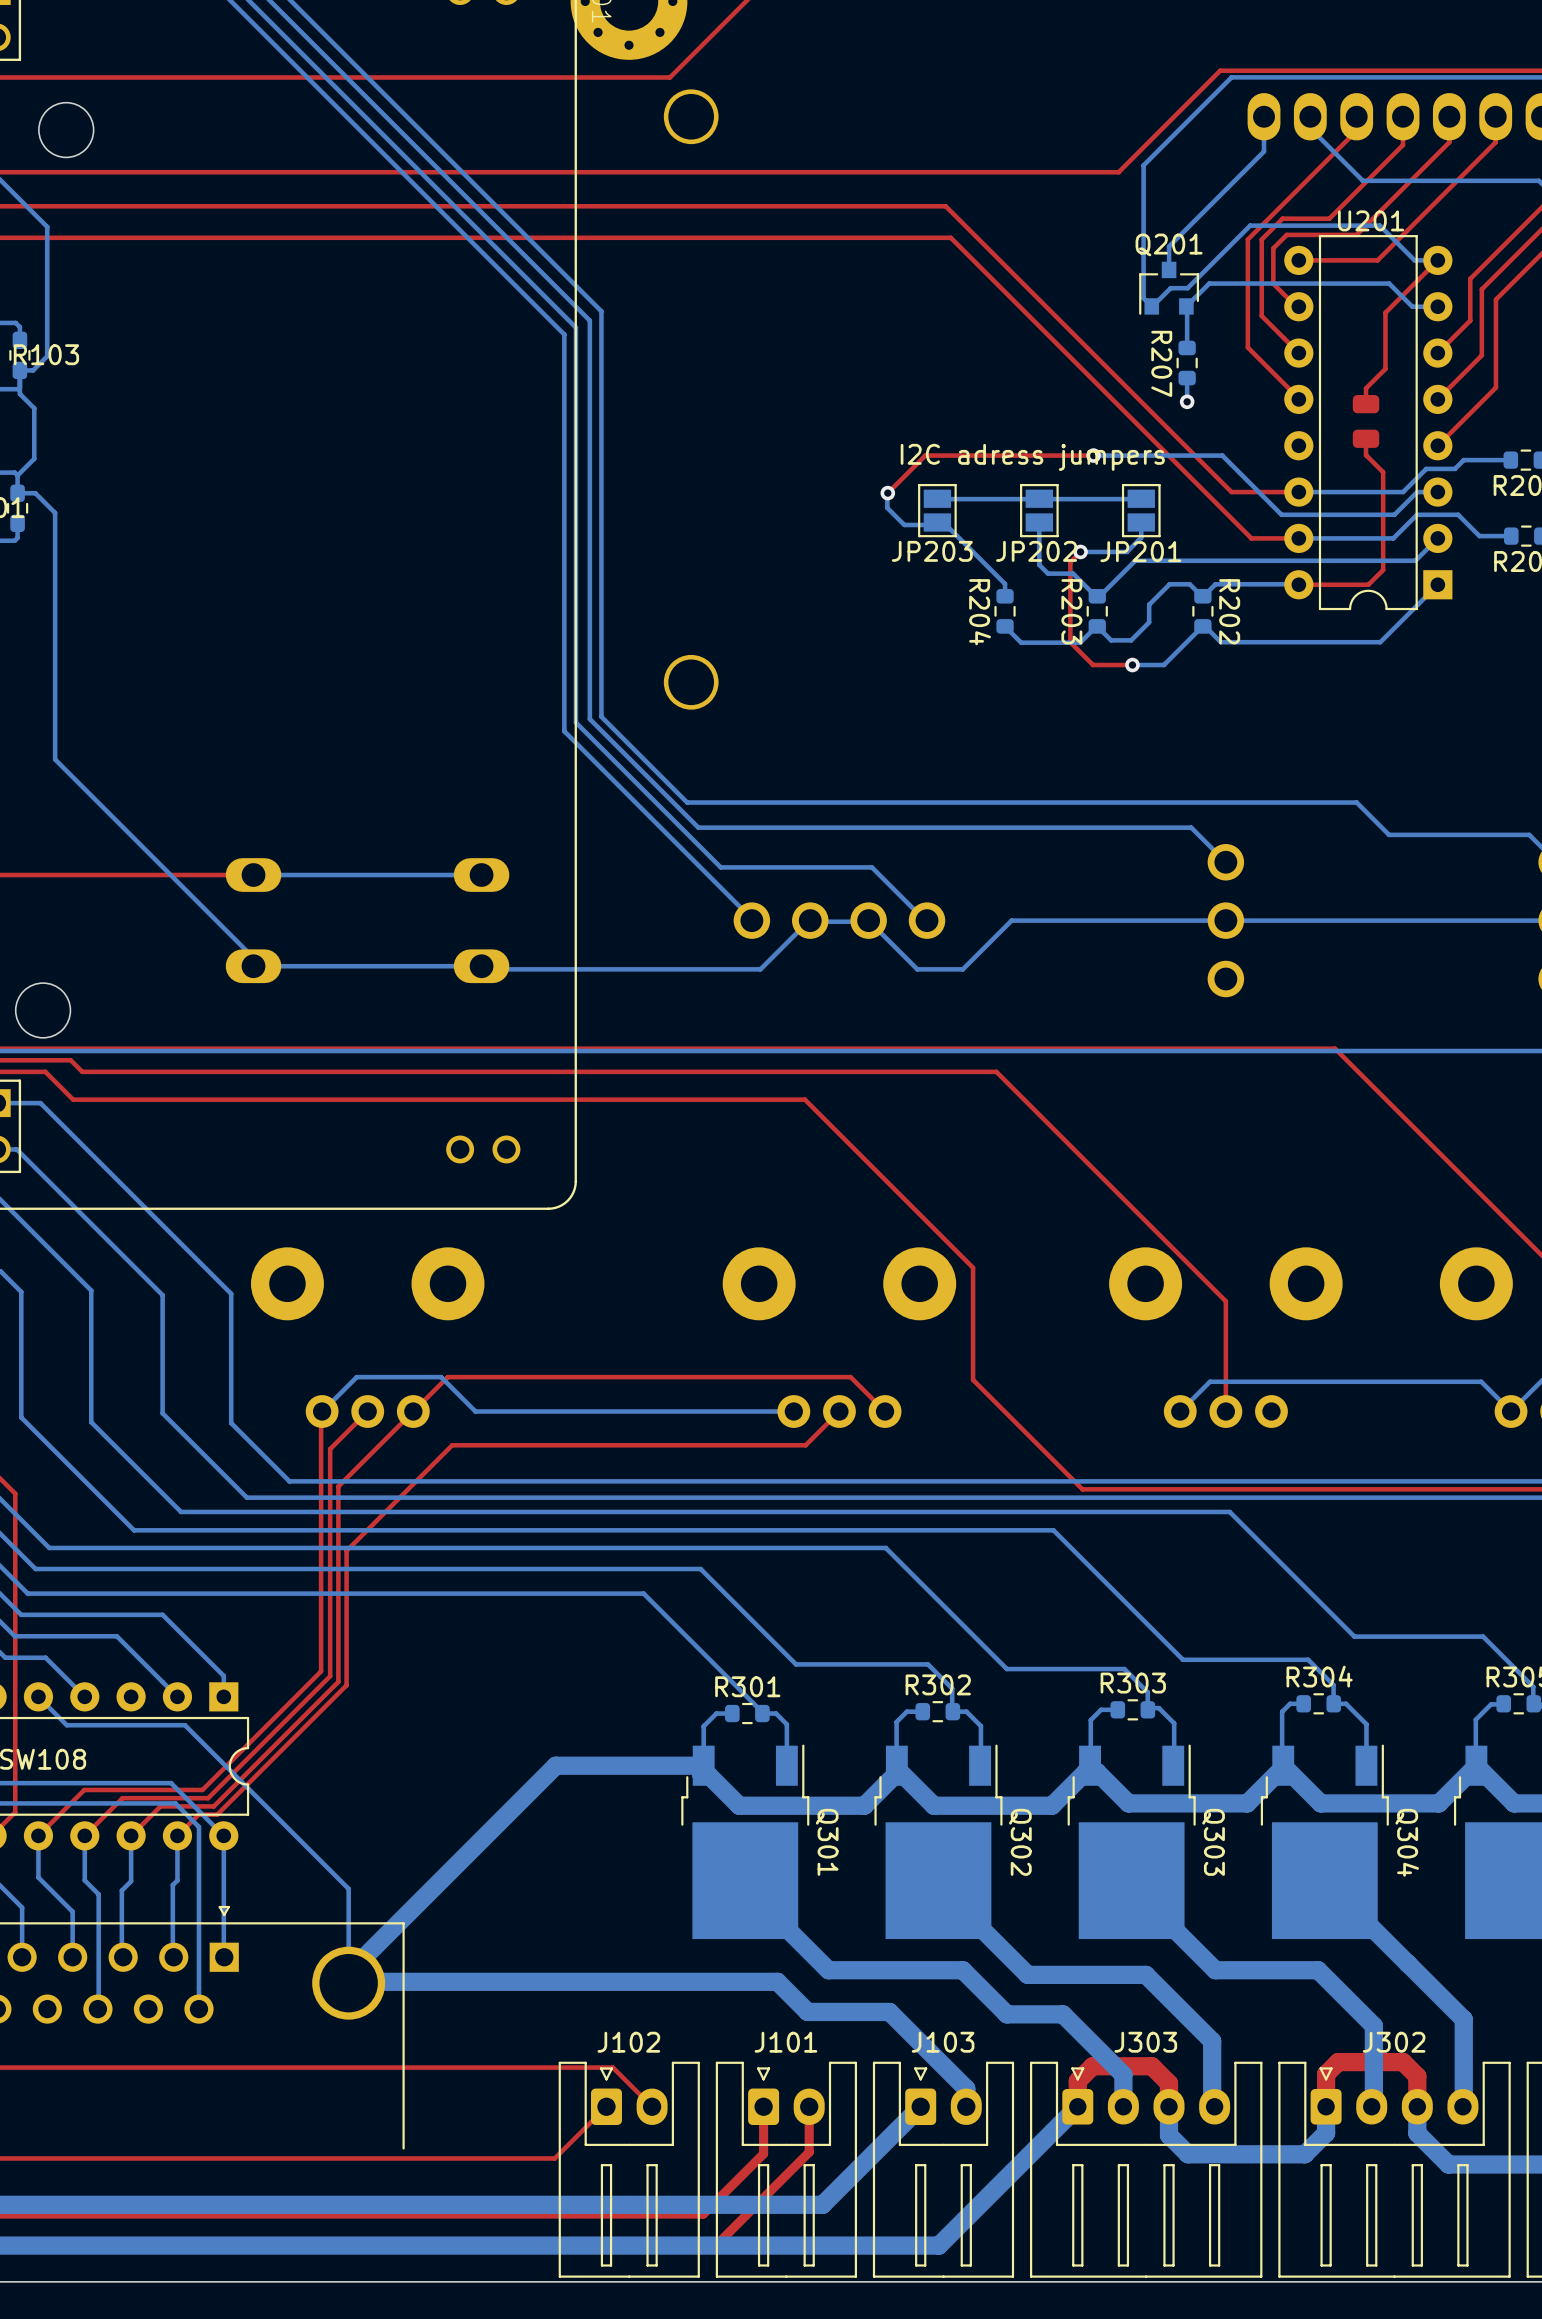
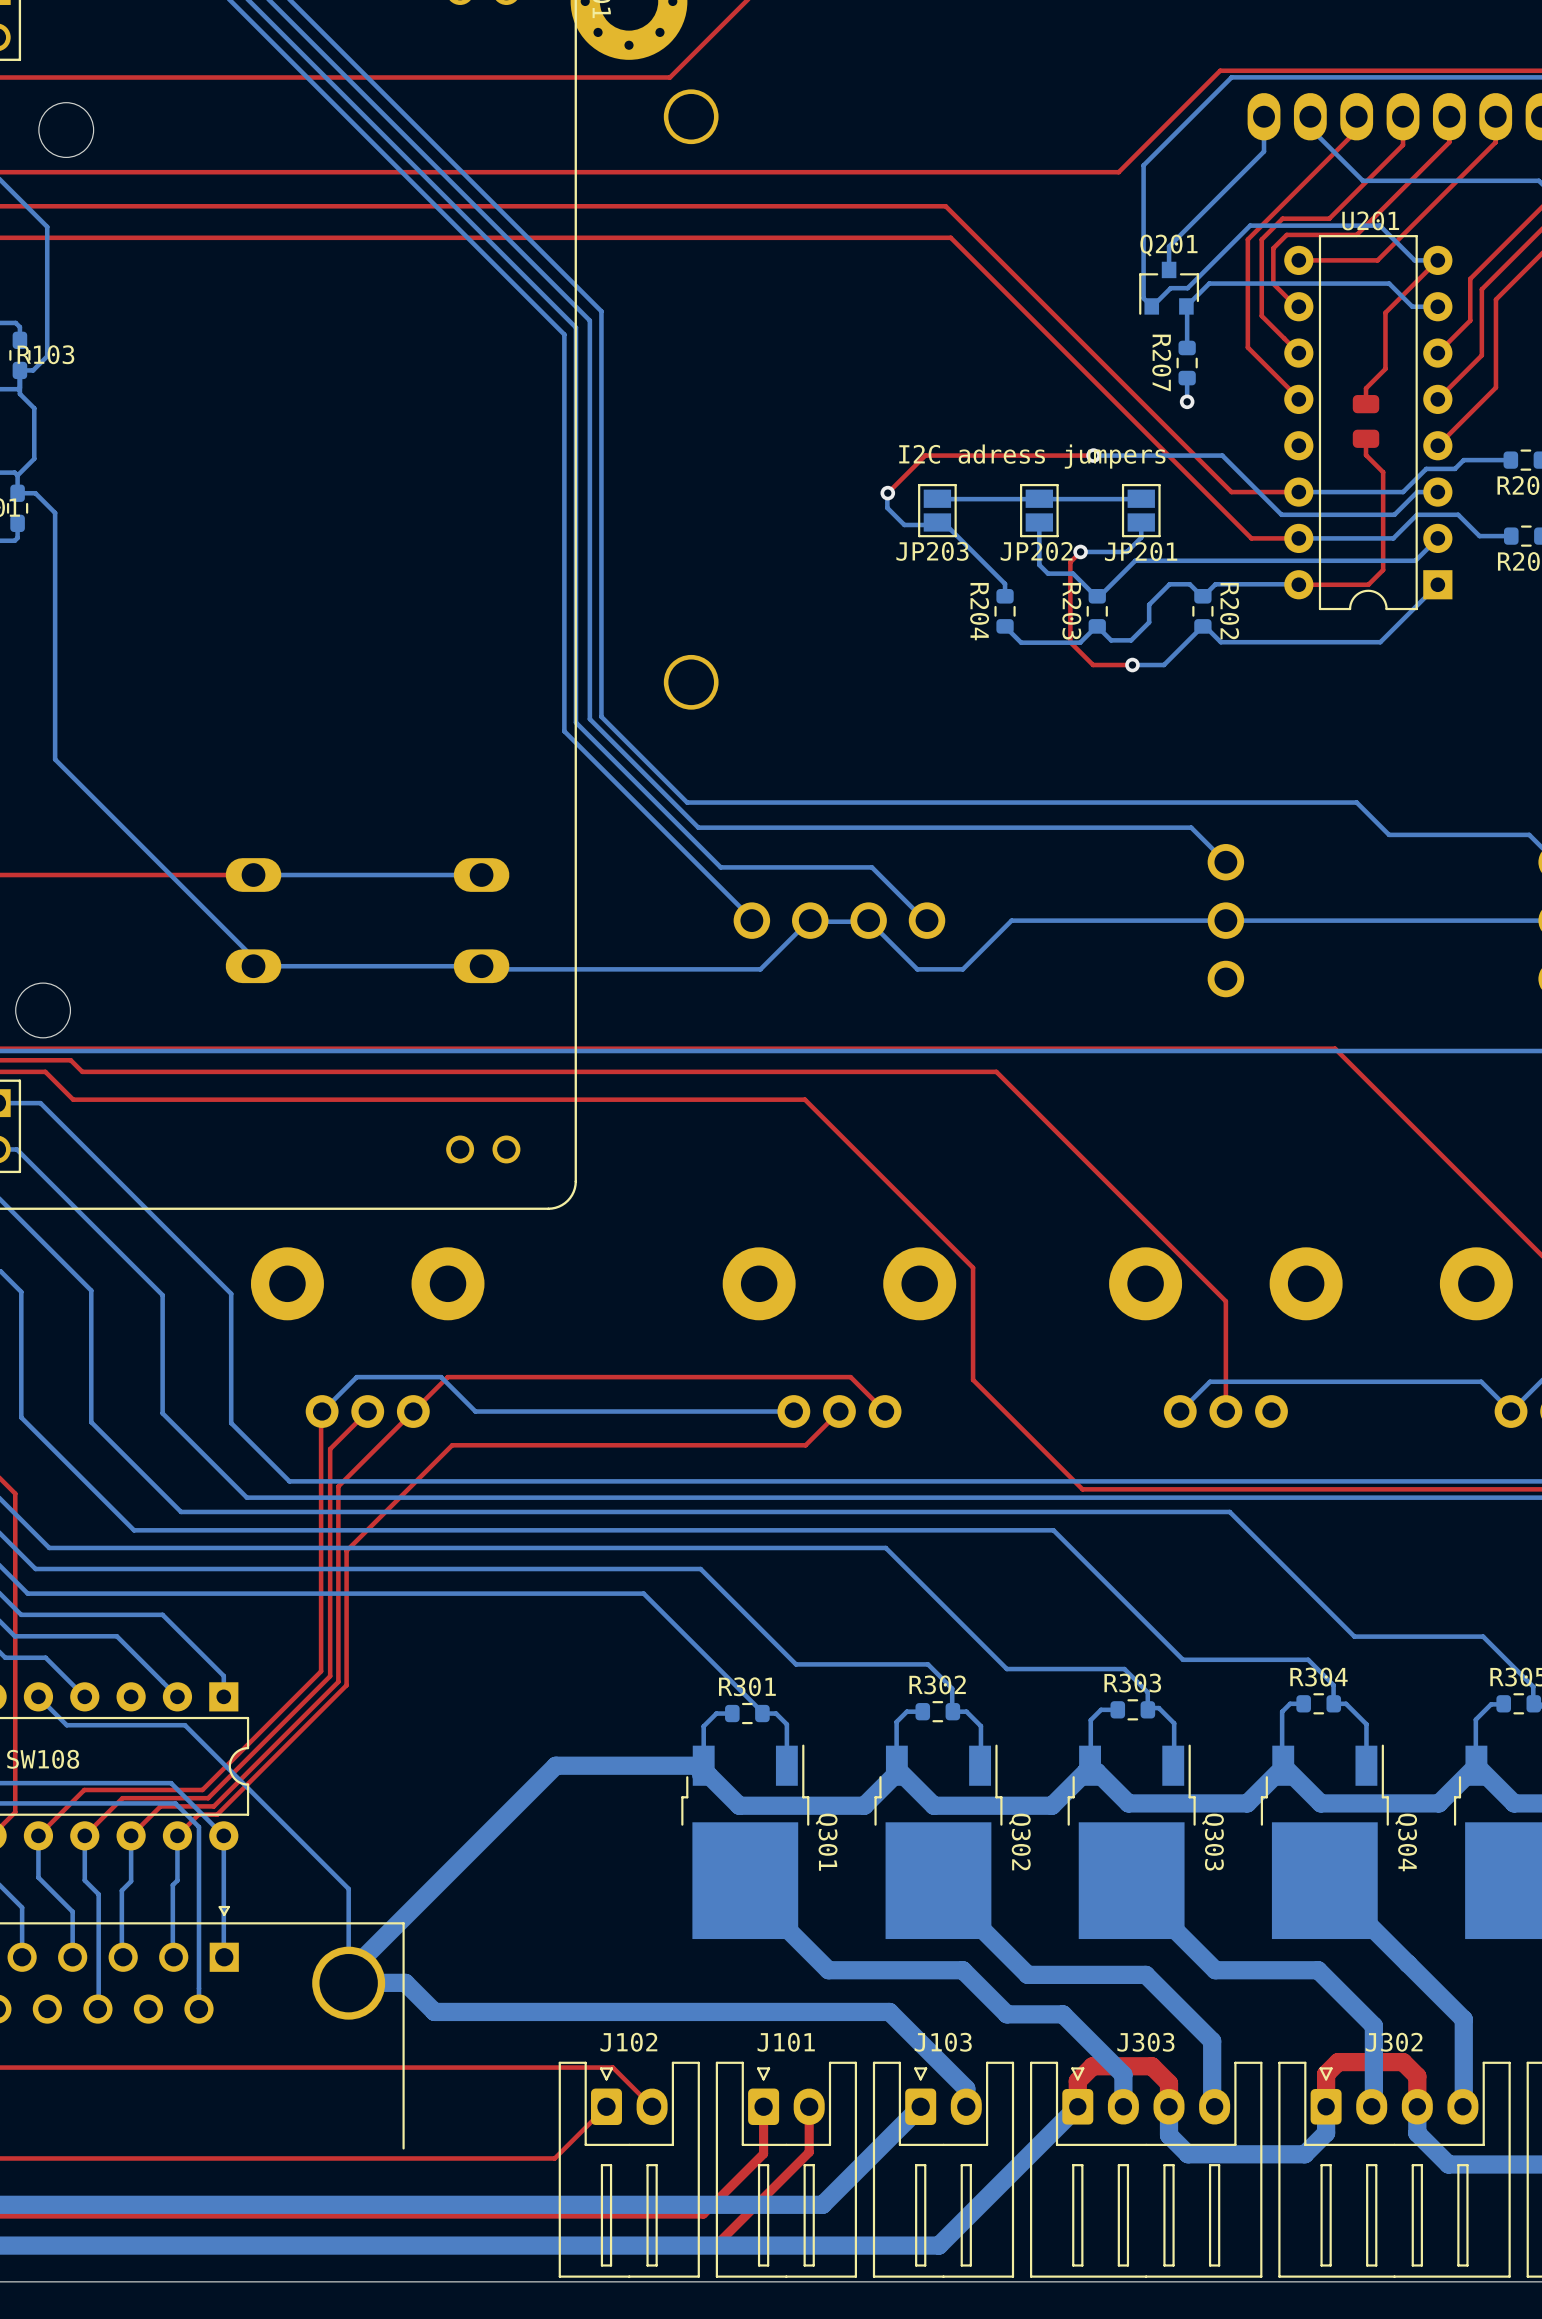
bottom track: (348, 1982) (777, 1981) (807, 2011) -> (348, 1982) (405, 1982) (434, 2011) (807, 2011)

